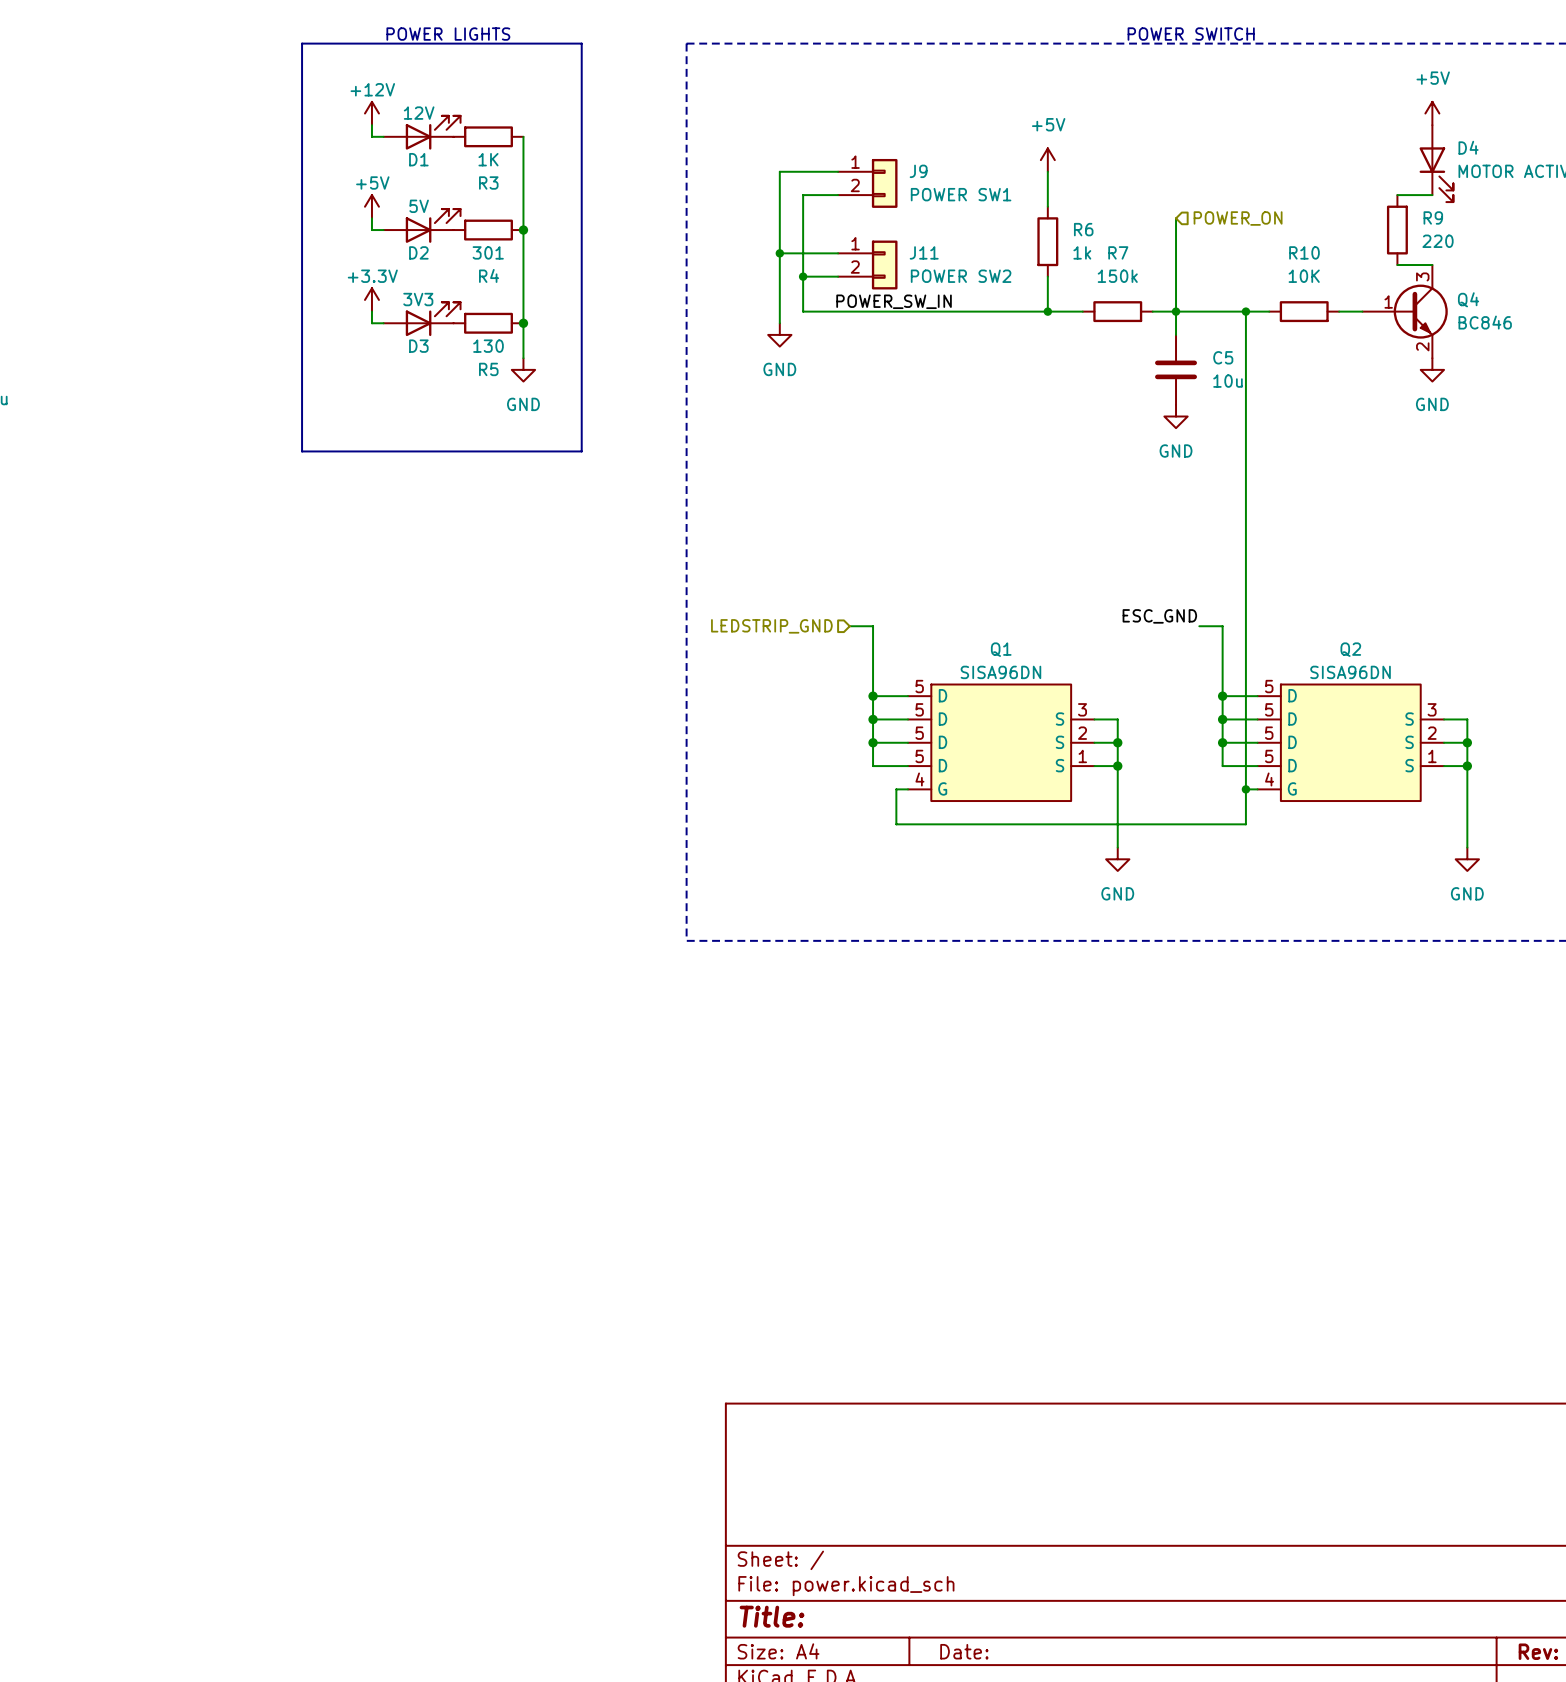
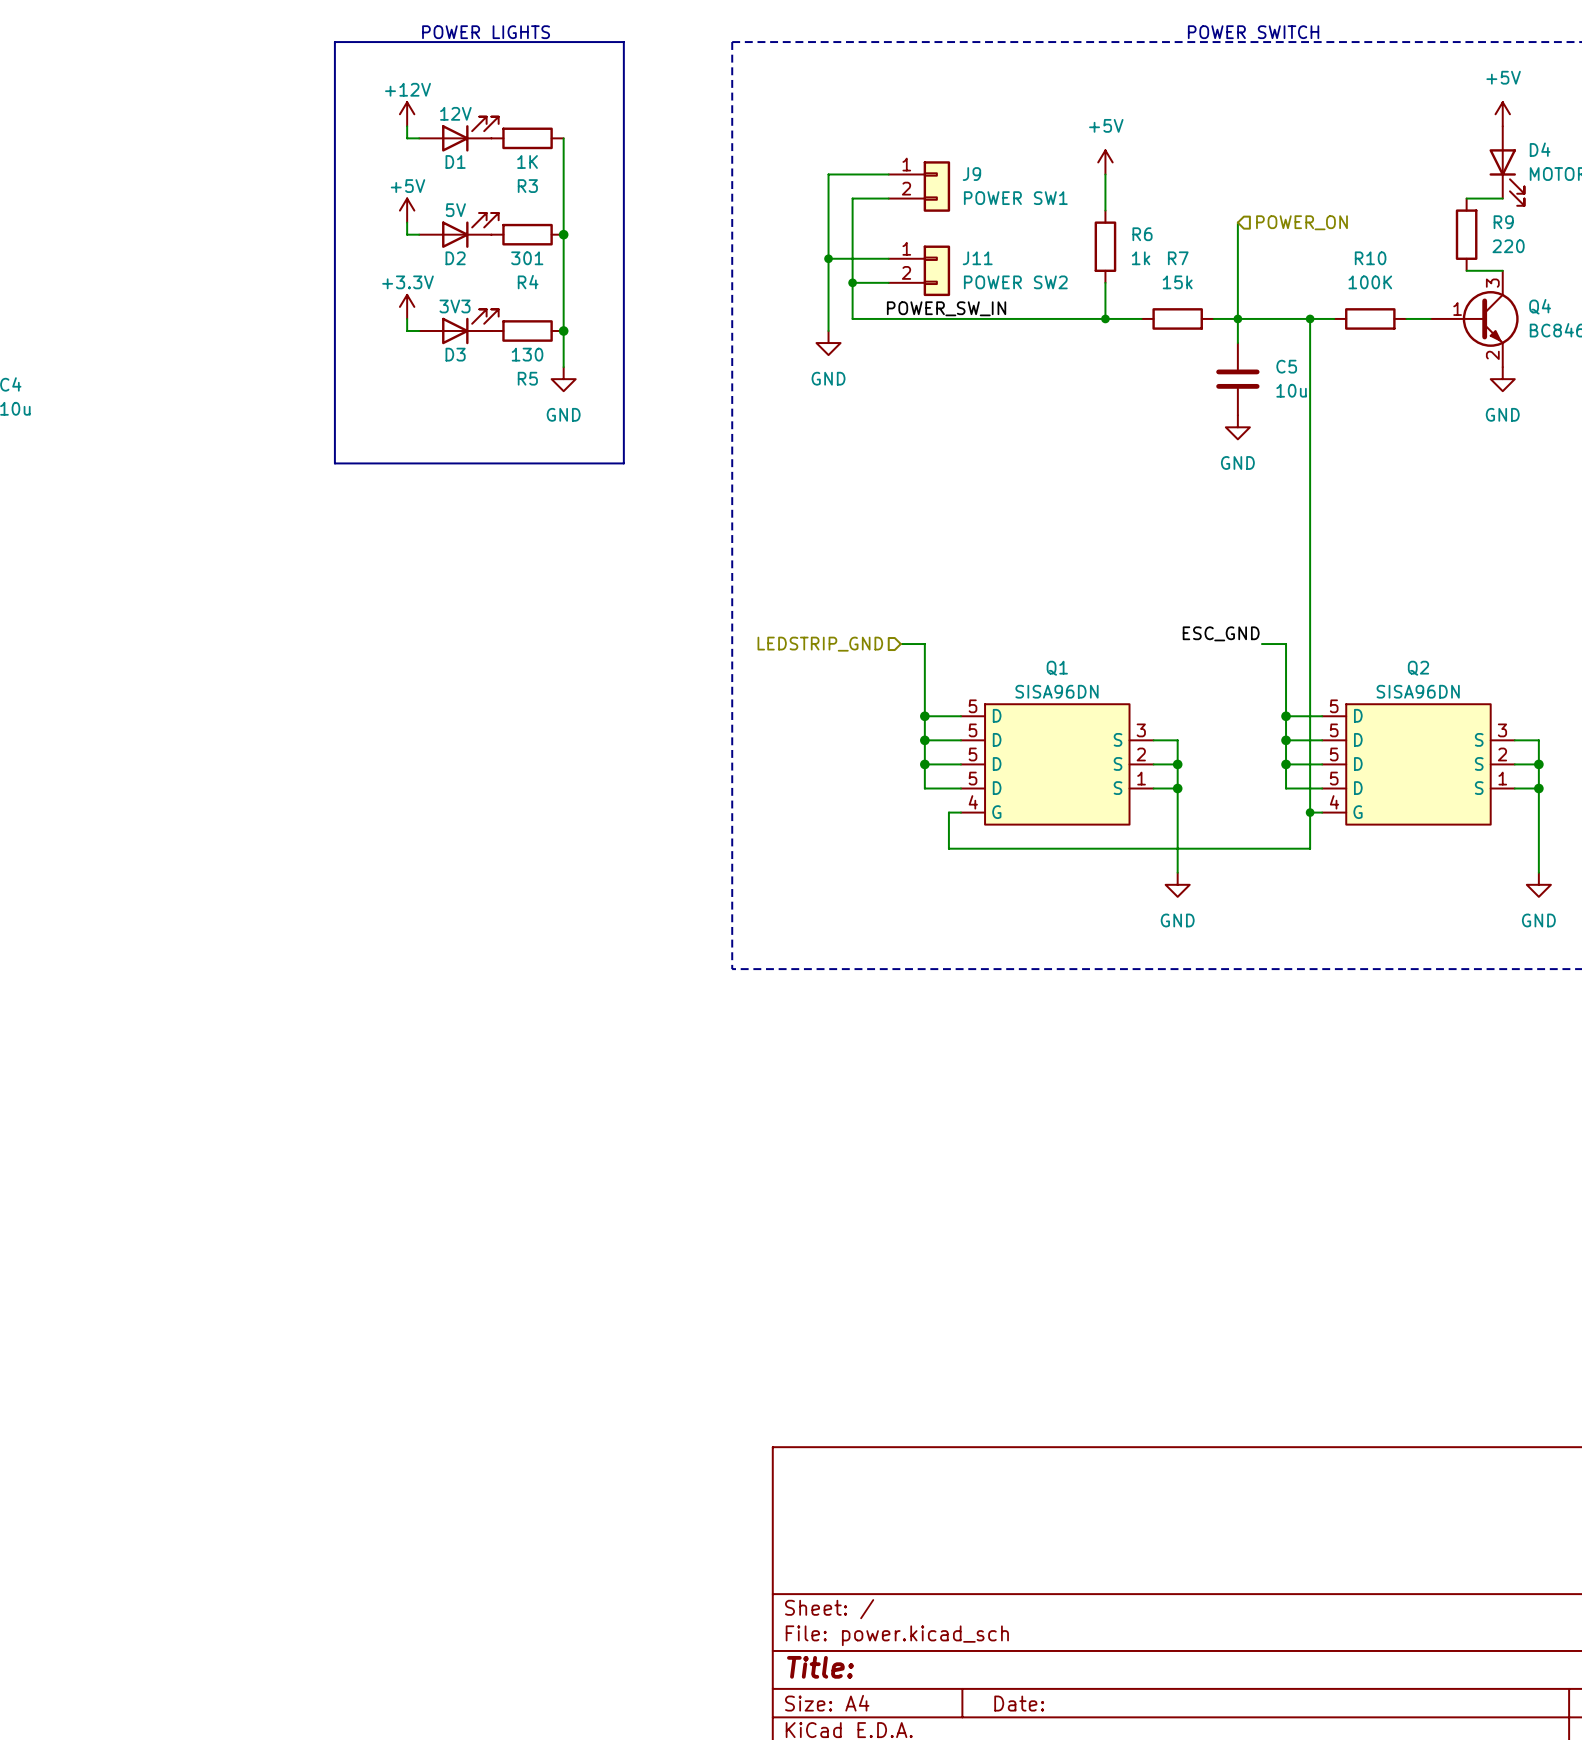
R7 value: 150k (1117, 276) -> 15k (1177, 282)
R10 value: 10K (1304, 276) -> 100K (1370, 282)

